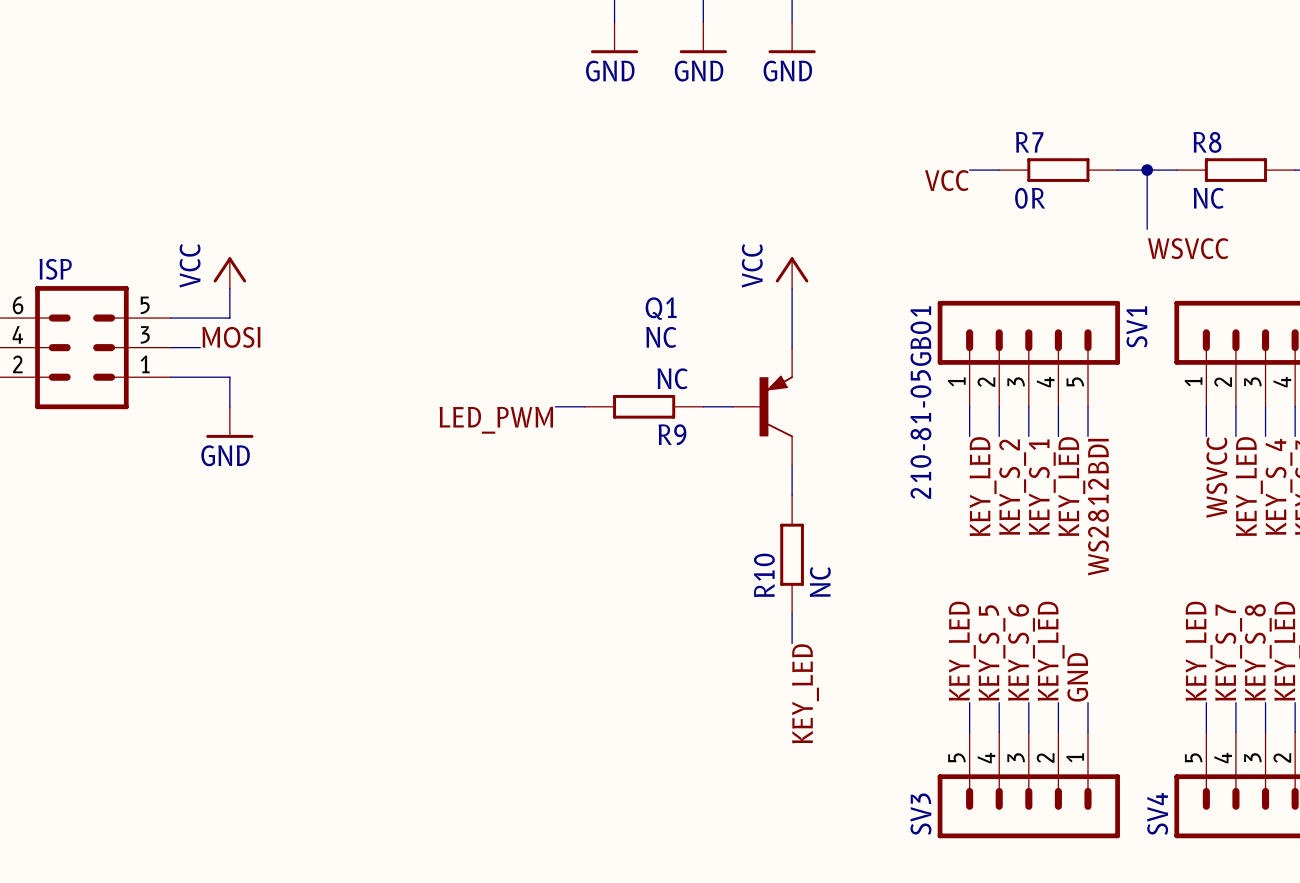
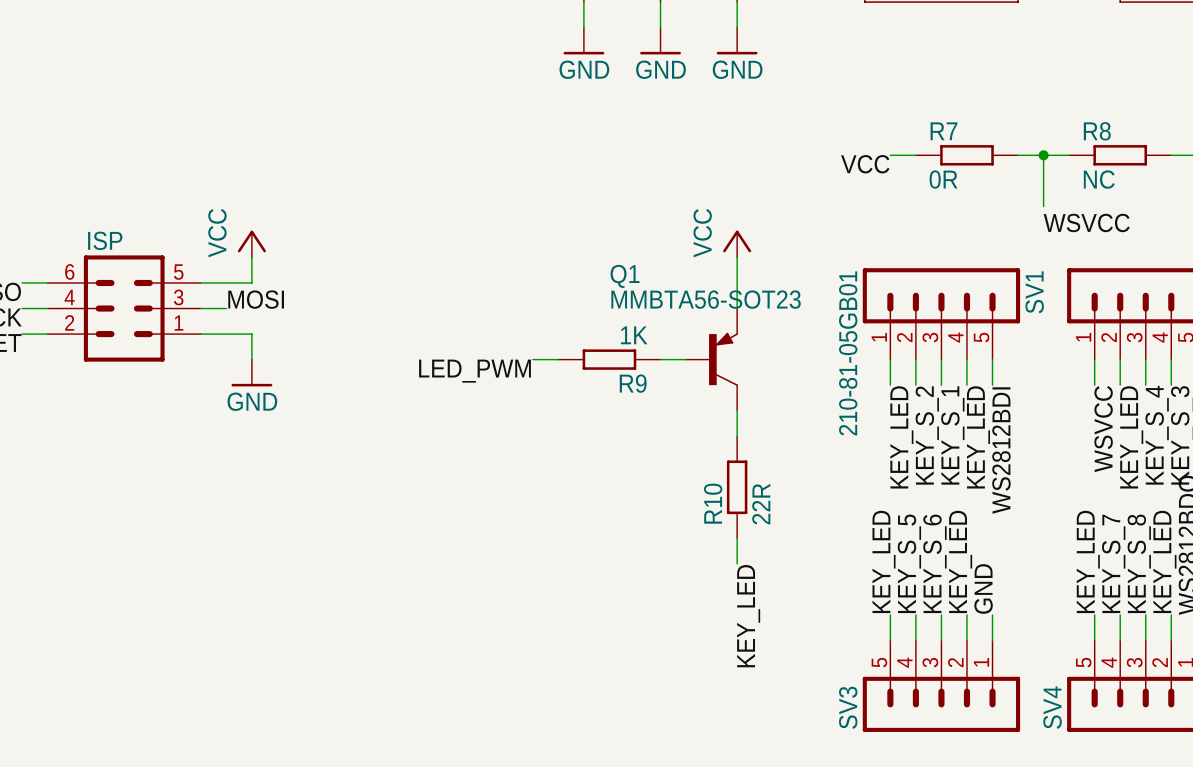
Q1 value: NC (661, 337) -> MMBTA56-SOT23 (706, 299)
R9 value: NC (672, 378) -> 1K (634, 335)
R10 value: NC (820, 582) -> 22R (761, 504)

